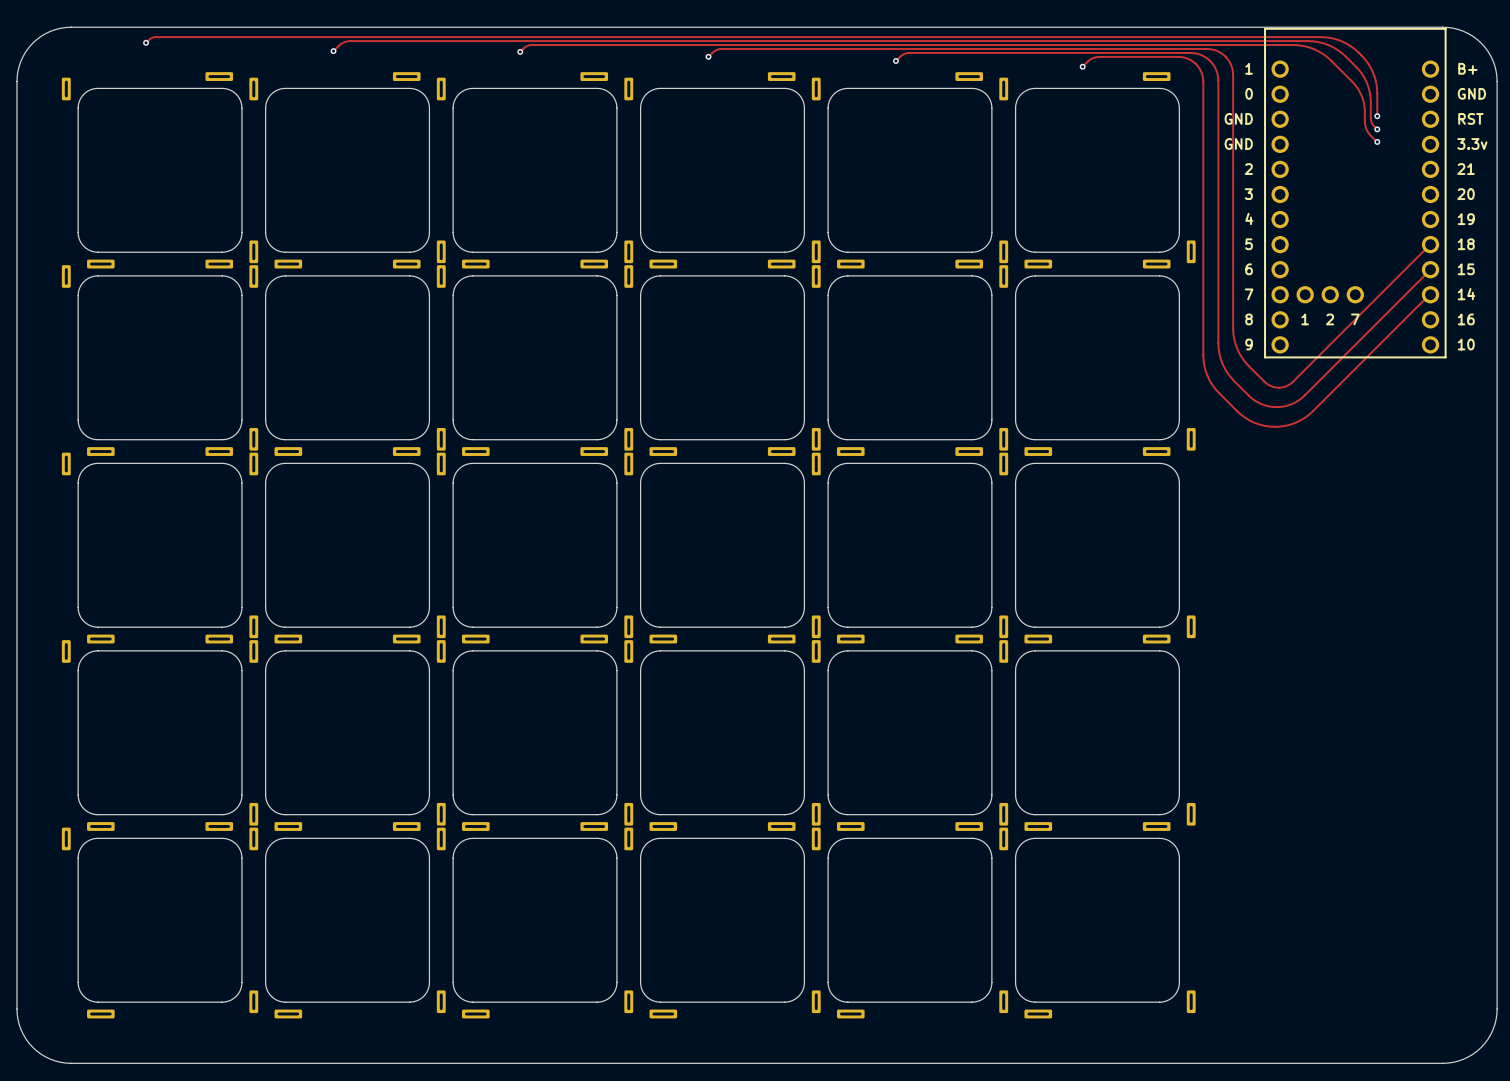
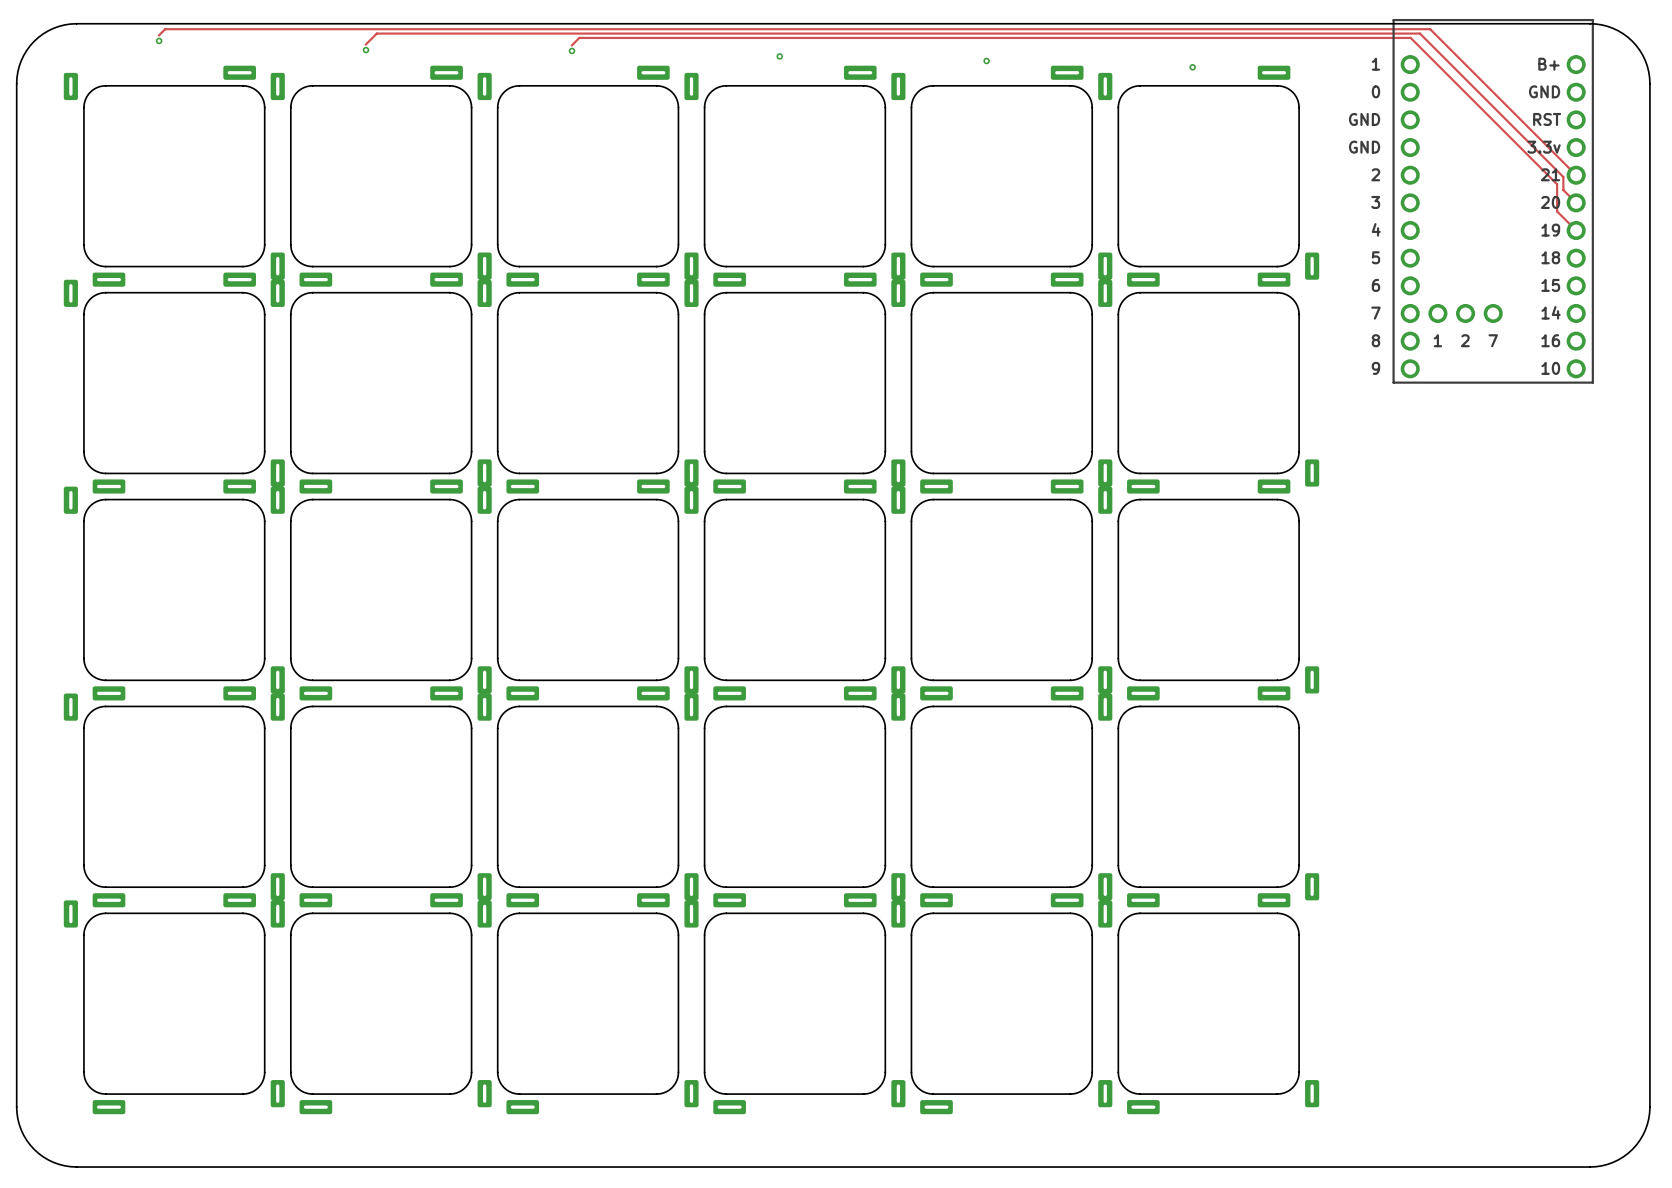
part footprint: [1264, 27, 1447, 359] -> [1392, 18, 1594, 384]
track: none -> (158, 35) (165, 29) (1430, 29) (1576, 175)
track: (146, 42) (155, 37) (1326, 37) (1341, 41) (1350, 46) (1368, 63) (1376, 82) (1377, 116) -> none
track: none -> (365, 44) (376, 33) (1419, 33) (1563, 176) (1563, 190) (1576, 202)
track: none -> (571, 45) (579, 37) (1410, 37) (1557, 184) (1557, 211) (1576, 230)
track: (333, 51) (342, 43) (350, 41) (1313, 41) (1328, 45) (1337, 50) (1362, 74) (1369, 92) (1371, 121) (1377, 129) -> none
track: (520, 51) (526, 46) (531, 45) (1298, 45) (1313, 49) (1323, 54) (1355, 84) (1363, 99) (1366, 129) (1377, 141) -> none
track: (708, 56) (715, 50) (721, 48) (1207, 48) (1219, 52) (1229, 62) (1233, 75) (1234, 338) (1239, 353) (1245, 362) (1264, 381) (1273, 387) (1284, 387) (1293, 381) (1430, 244) -> none
track: (895, 60) (903, 54) (909, 52) (1190, 52) (1201, 55) (1210, 61) (1216, 70) (1218, 80) (1219, 353) (1224, 368) (1230, 377) (1251, 398) (1261, 404) (1272, 406) (1284, 406) (1301, 398) (1430, 269) -> none
track: (1082, 66) (1090, 59) (1097, 56) (1178, 56) (1190, 60) (1201, 72) (1203, 81) (1203, 360) (1207, 375) (1212, 384) (1245, 417) (1259, 424) (1275, 426) (1290, 424) (1304, 417) (1430, 294) -> none
part footprint: [61, 72, 259, 269] -> [63, 65, 285, 287]
part footprint: [249, 72, 446, 269] -> [270, 65, 492, 287]
part footprint: [436, 72, 634, 269] -> [477, 65, 699, 287]
part footprint: [624, 72, 821, 269] -> [684, 65, 906, 287]
part footprint: [811, 72, 1009, 269] -> [891, 65, 1113, 287]
part footprint: [999, 72, 1196, 269] -> [1098, 65, 1320, 287]
via: (1377, 116) -> none
via: (1377, 129) -> none
via: (1377, 141) -> none
part footprint: [61, 259, 259, 456] -> [63, 272, 285, 494]
part footprint: [249, 259, 446, 456] -> [270, 272, 492, 494]
part footprint: [436, 259, 634, 456] -> [477, 272, 699, 494]
part footprint: [624, 259, 821, 456] -> [684, 272, 906, 494]
part footprint: [811, 259, 1009, 456] -> [891, 272, 1113, 494]
part footprint: [999, 259, 1196, 456] -> [1098, 272, 1320, 494]
part footprint: [61, 447, 259, 644] -> [63, 479, 285, 701]
part footprint: [249, 447, 446, 644] -> [270, 479, 492, 701]
part footprint: [436, 447, 634, 644] -> [477, 479, 699, 701]
part footprint: [624, 447, 821, 644] -> [684, 479, 906, 701]
part footprint: [811, 447, 1009, 644] -> [891, 479, 1113, 701]
part footprint: [999, 447, 1196, 644] -> [1098, 479, 1320, 701]
part footprint: [61, 634, 259, 831] -> [63, 686, 285, 908]
part footprint: [249, 634, 446, 831] -> [270, 686, 492, 908]
part footprint: [436, 634, 634, 831] -> [477, 686, 699, 908]
part footprint: [624, 634, 821, 831] -> [684, 686, 906, 908]
part footprint: [811, 634, 1009, 831] -> [891, 686, 1113, 908]
part footprint: [999, 634, 1196, 831] -> [1098, 686, 1320, 908]
part footprint: [61, 822, 259, 1019] -> [63, 893, 285, 1115]
part footprint: [249, 822, 446, 1019] -> [270, 893, 492, 1115]
part footprint: [436, 822, 634, 1019] -> [477, 893, 699, 1115]
part footprint: [624, 822, 821, 1019] -> [684, 893, 906, 1115]
part footprint: [811, 822, 1009, 1019] -> [891, 893, 1113, 1115]
part footprint: [999, 822, 1196, 1019] -> [1098, 893, 1320, 1115]

